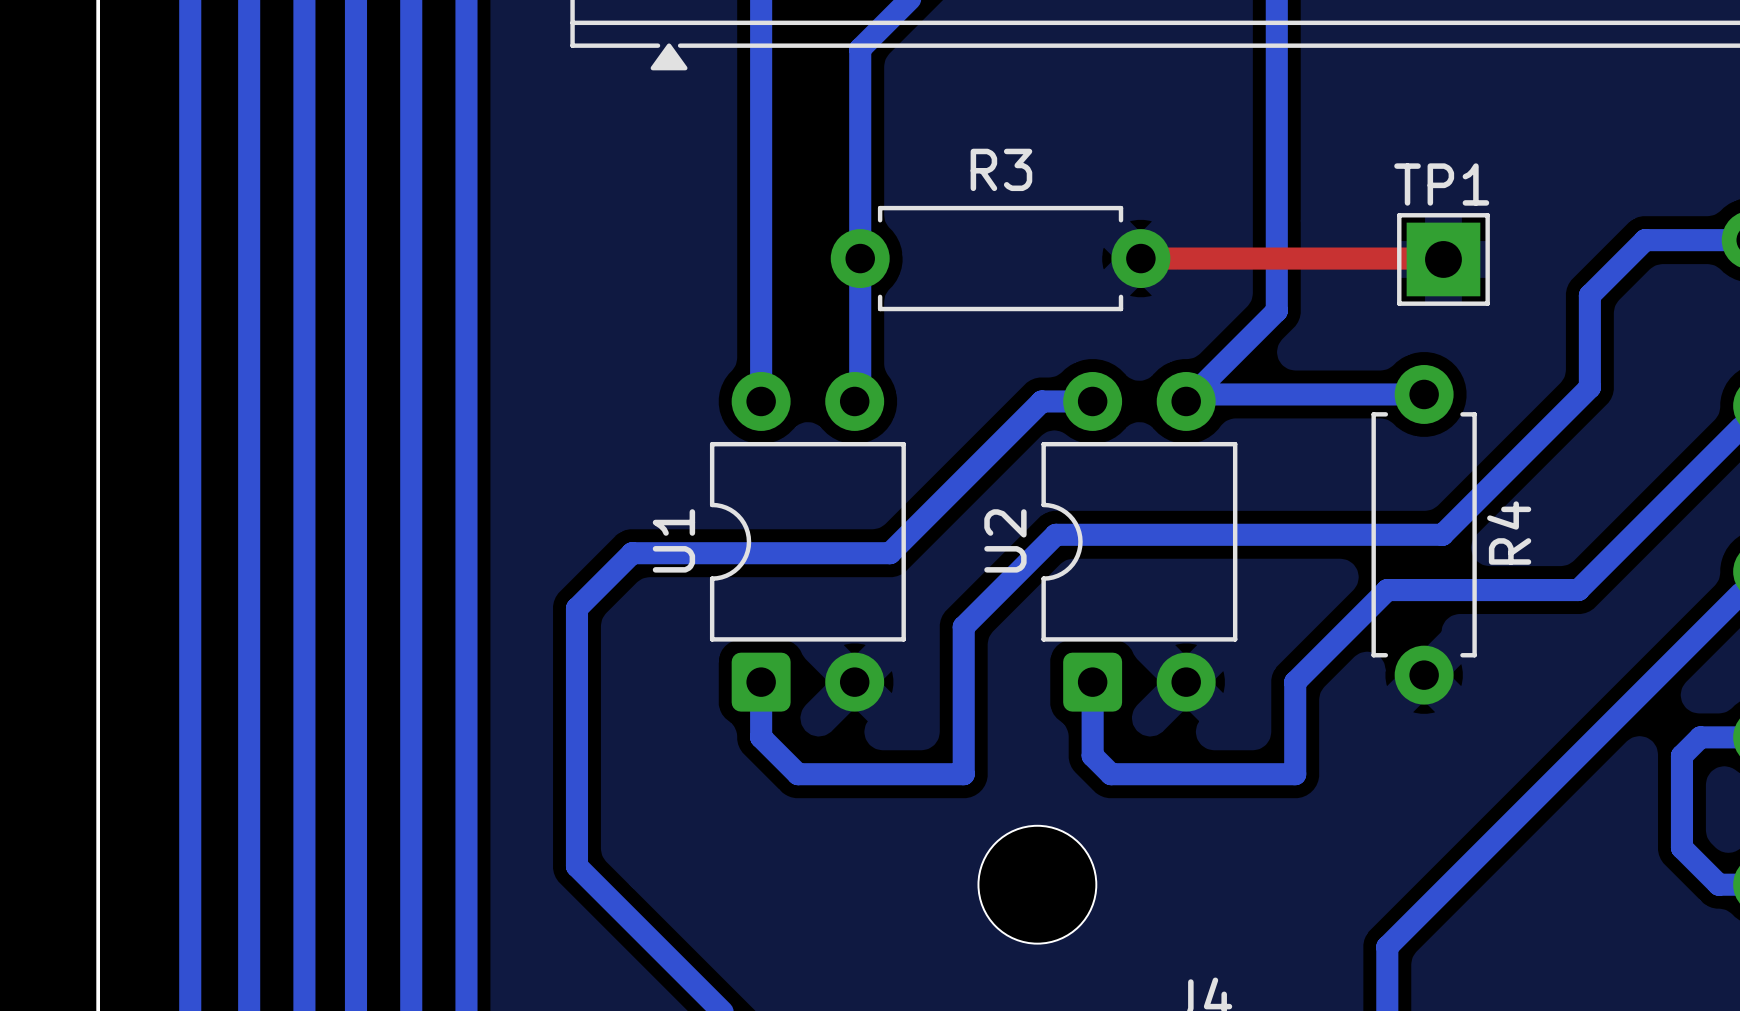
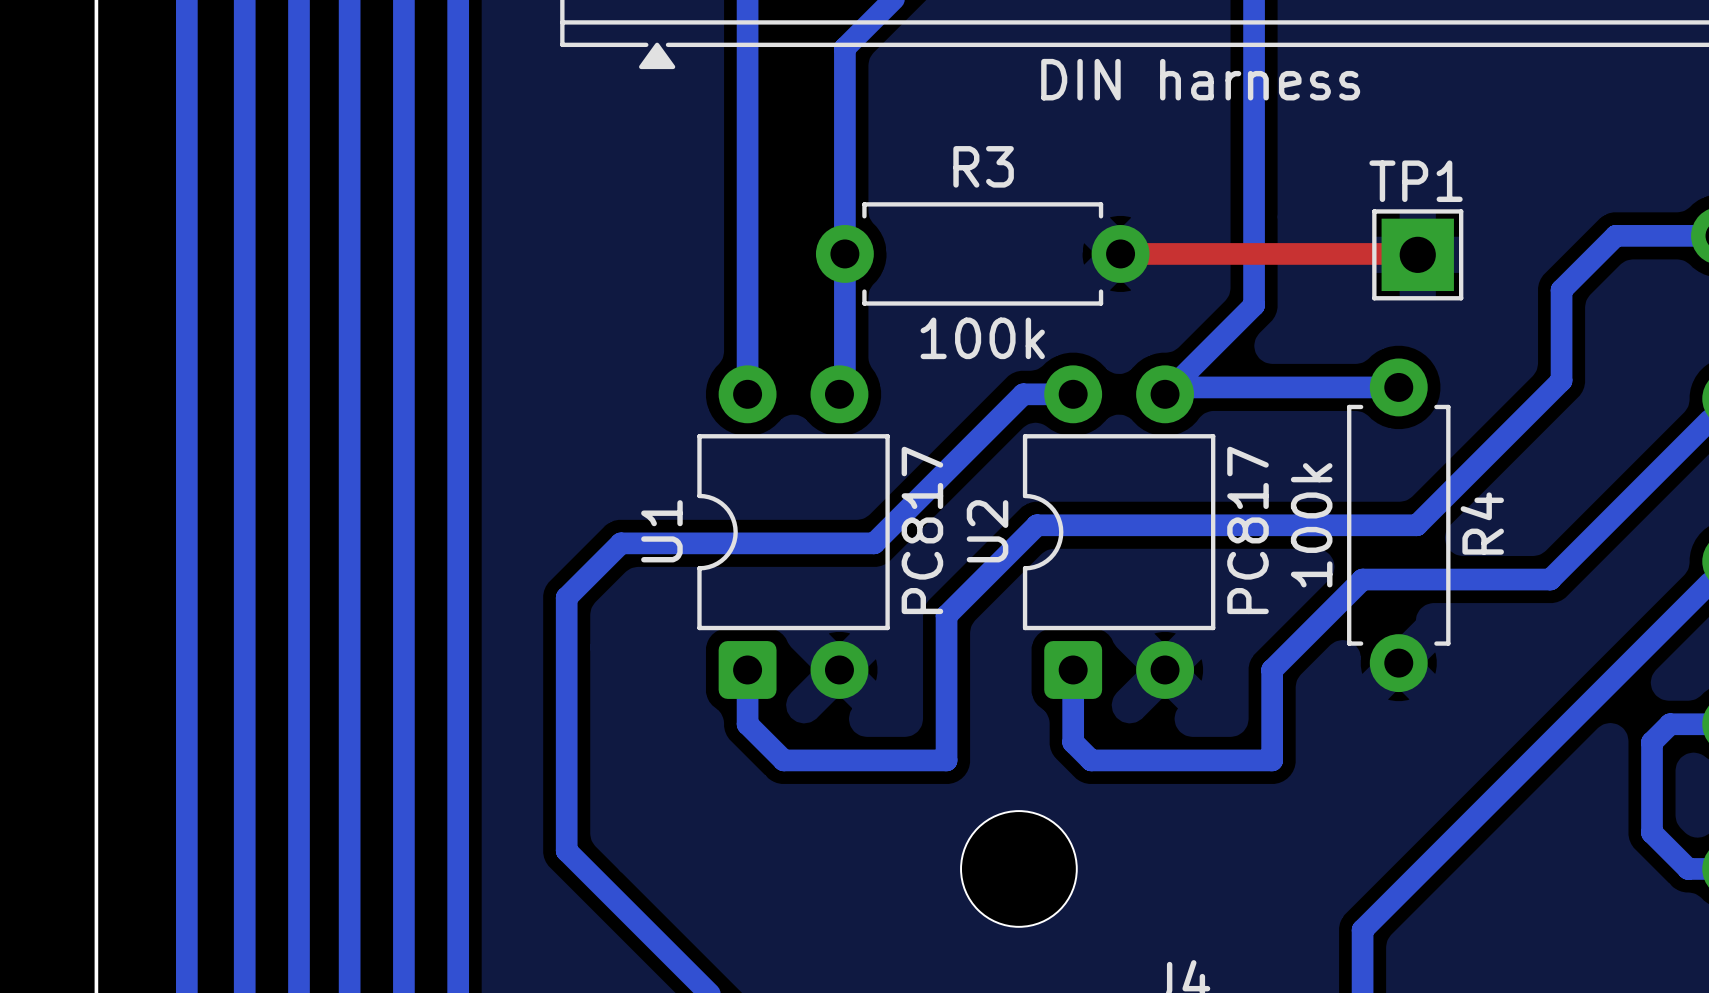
part value: none -> DIN harness (1200, 79)
R3 value: none -> 100k (982, 338)
R4 value: none -> 100k (1311, 525)
U1 value: none -> PC817 (922, 530)
U2 value: none -> PC817 (1248, 530)

